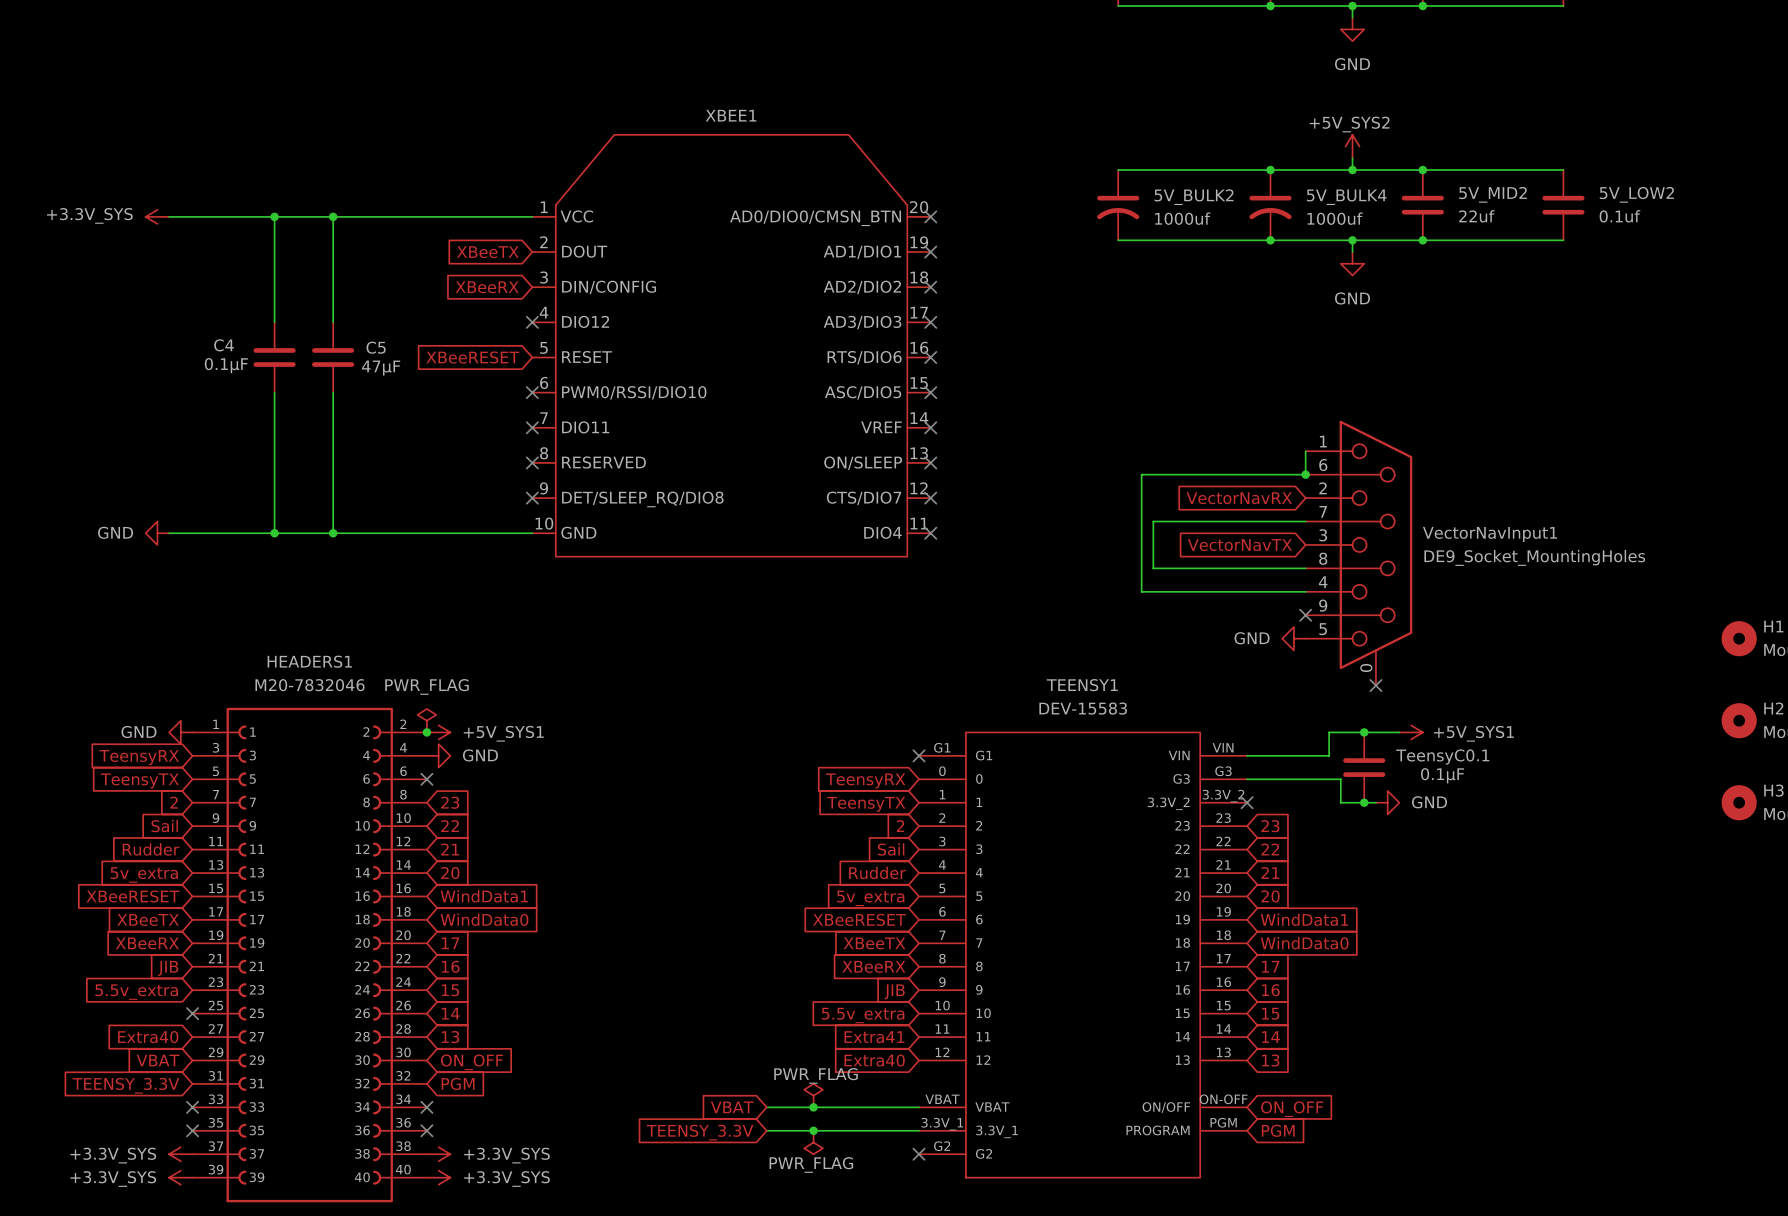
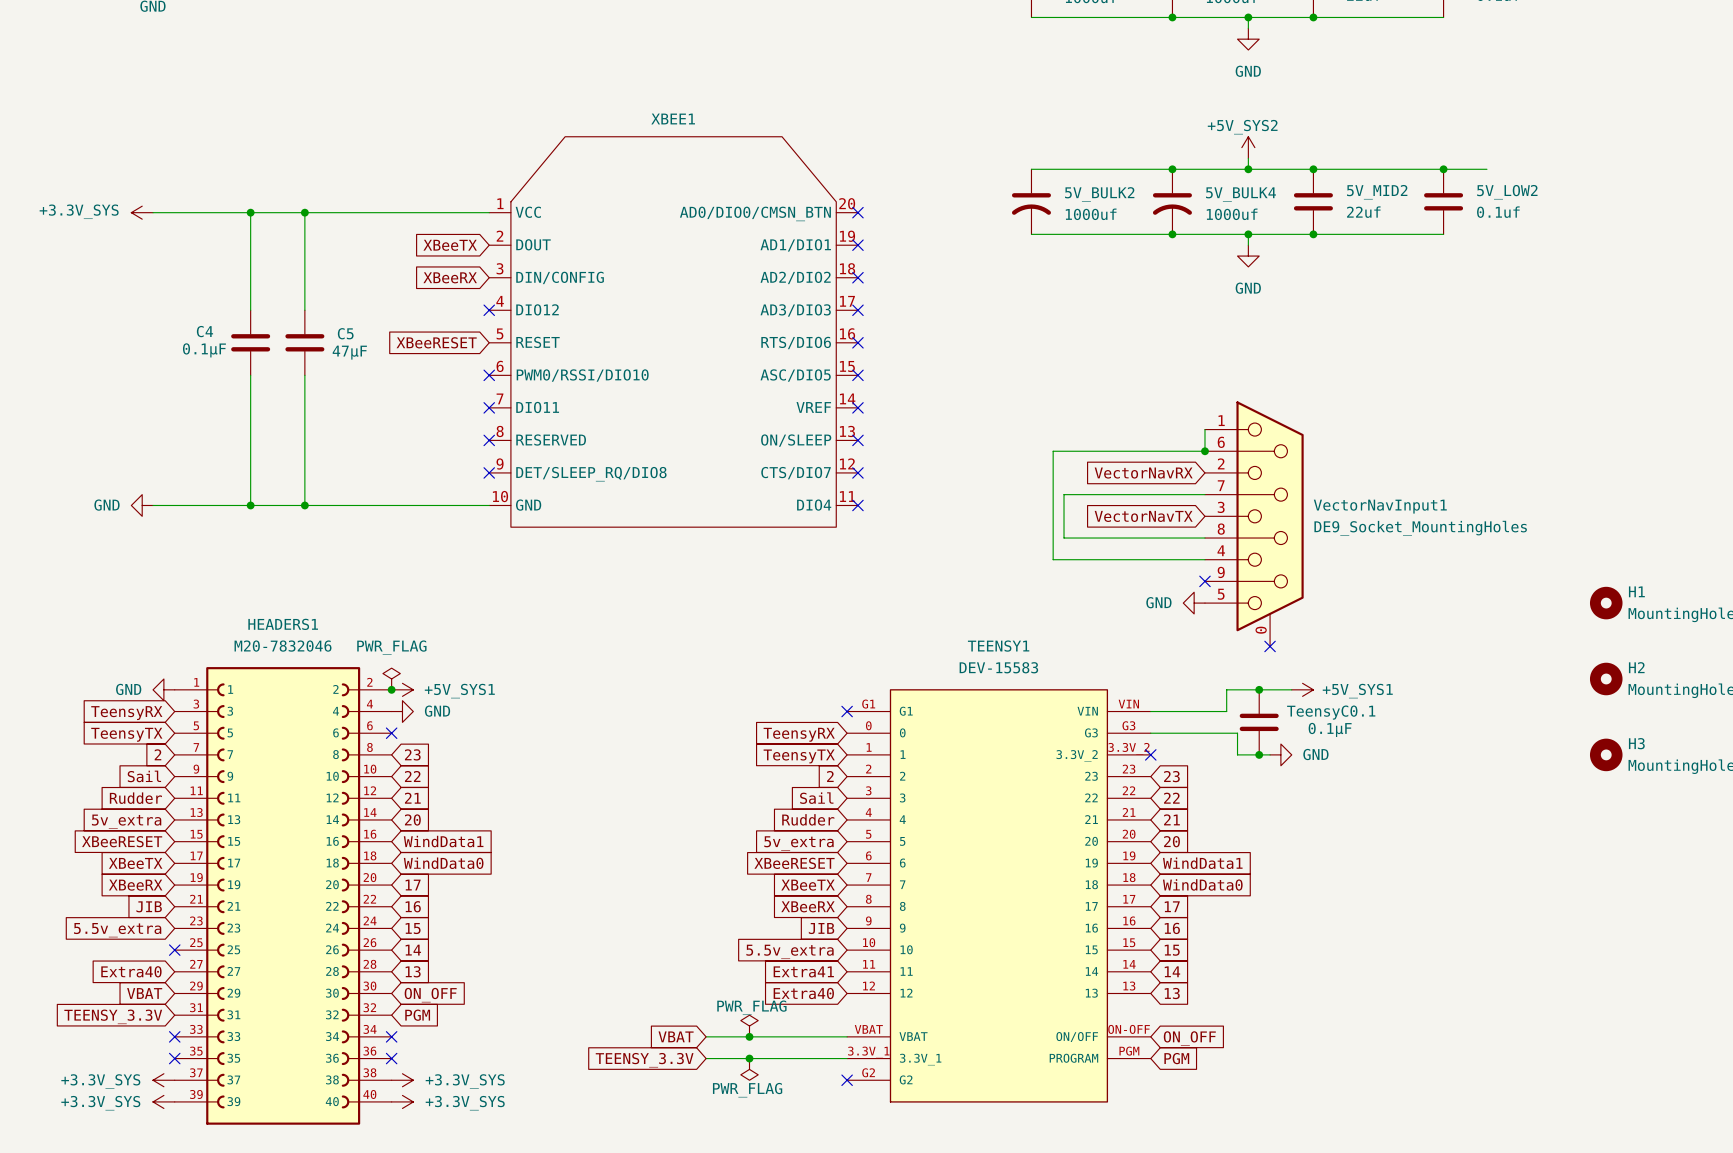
wire: none -> (1443, 169) (1486, 169)
junction: none -> (1443, 169)

